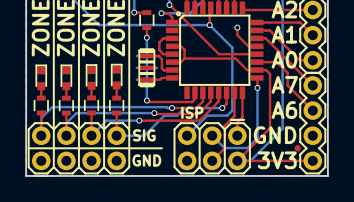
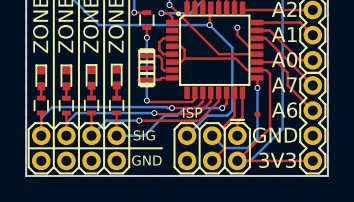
part footprint: [135, 48, 159, 88] -> [137, 48, 157, 88]
part position: (297, 148) -> (257, 114)

